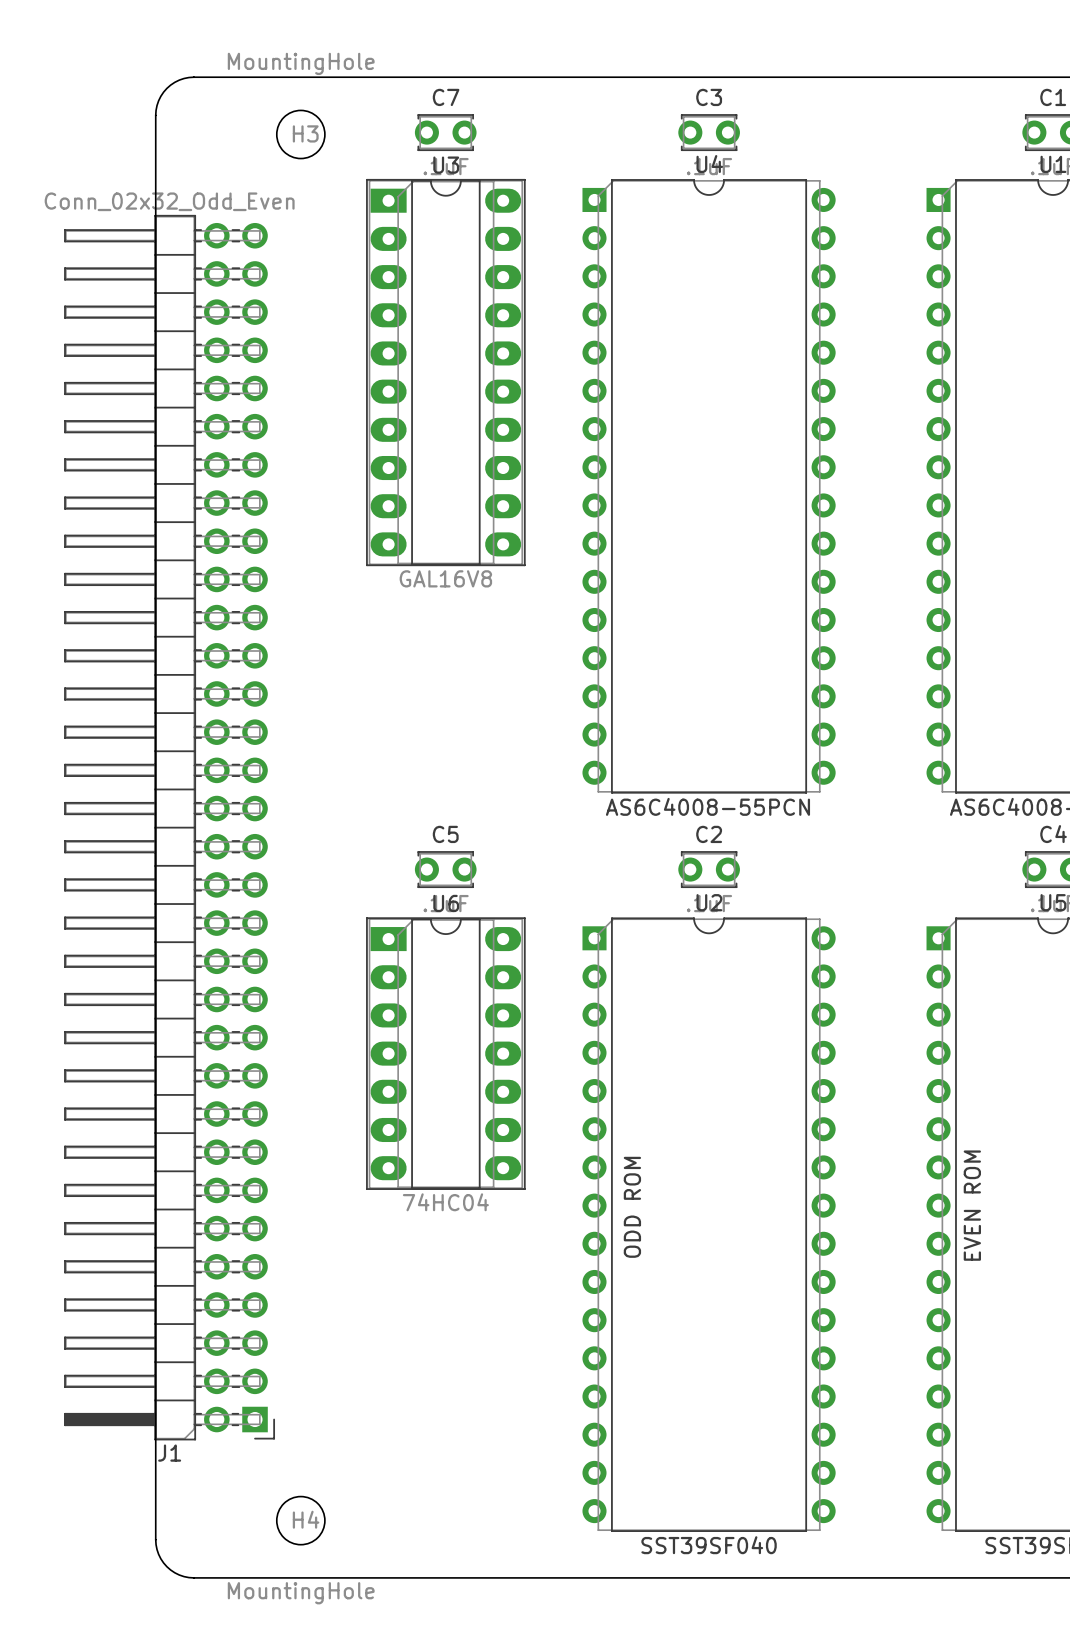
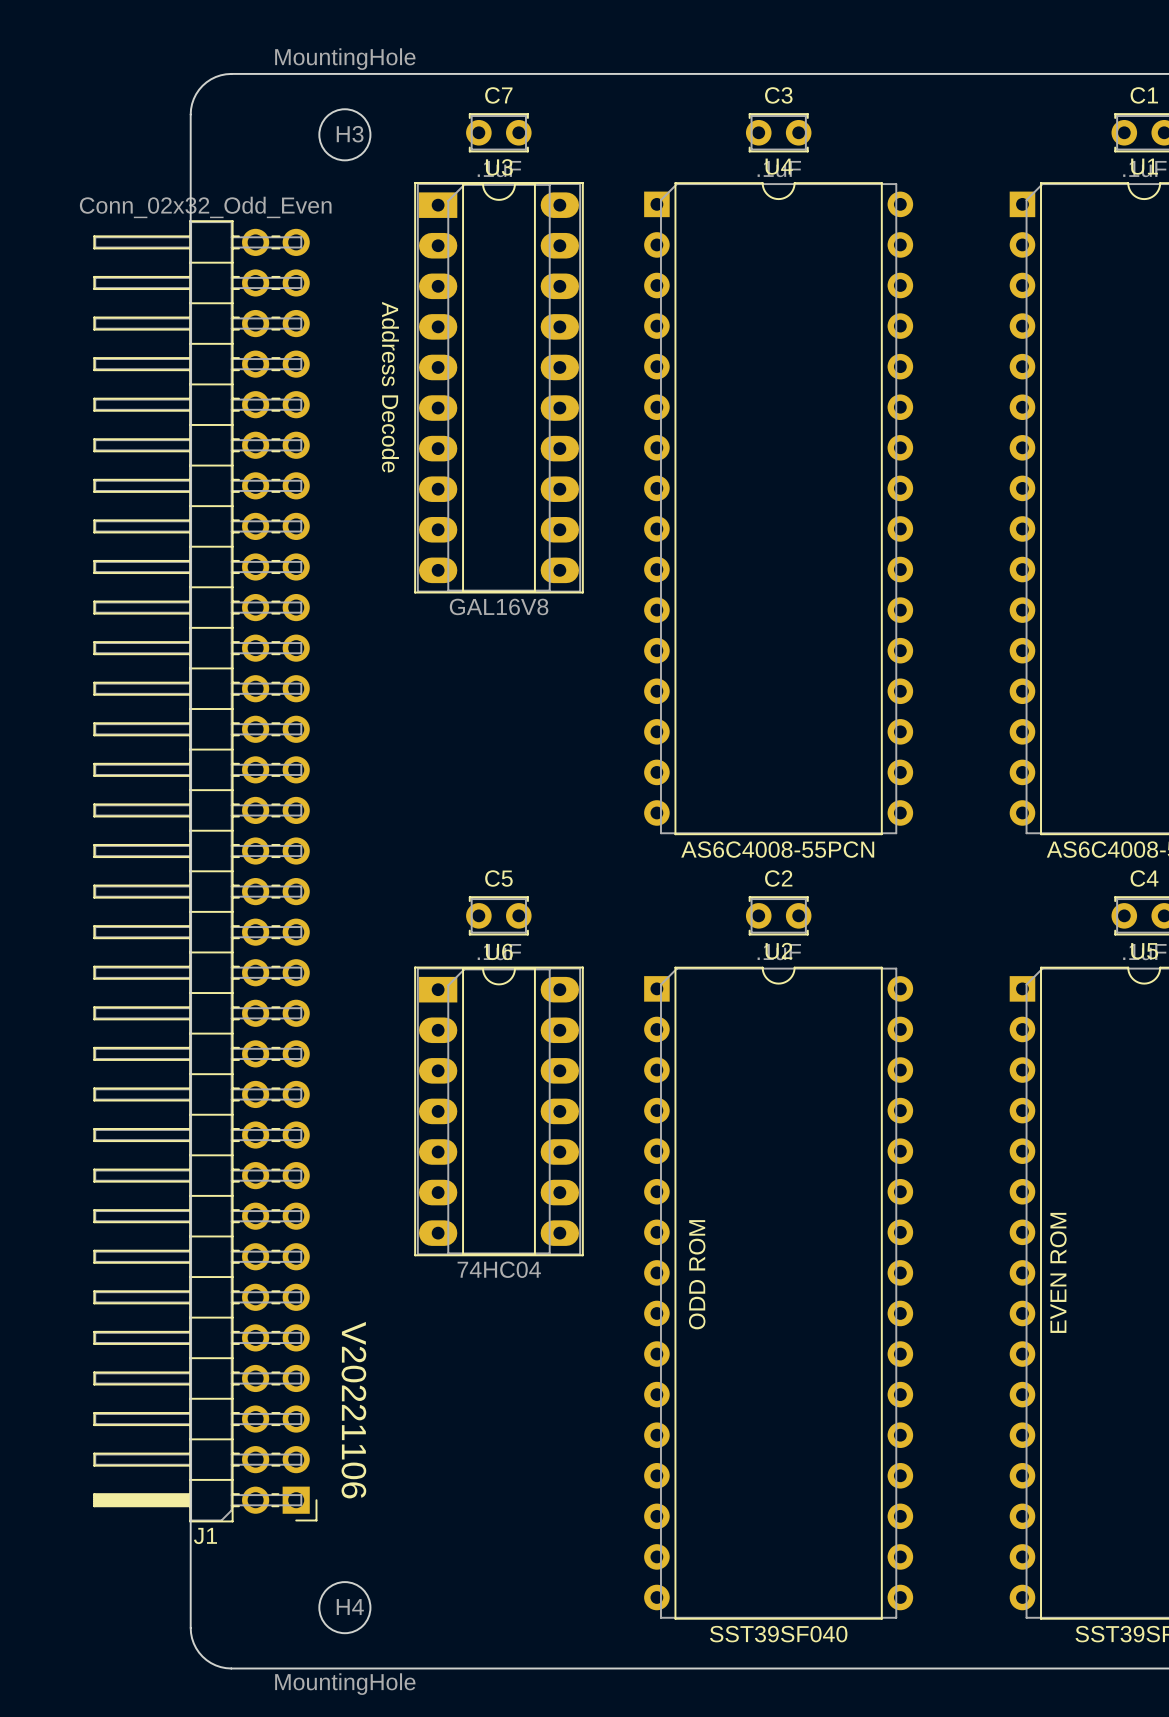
text: none -> Address Decode (390, 387)
text: none -> V20221106 (353, 1410)

